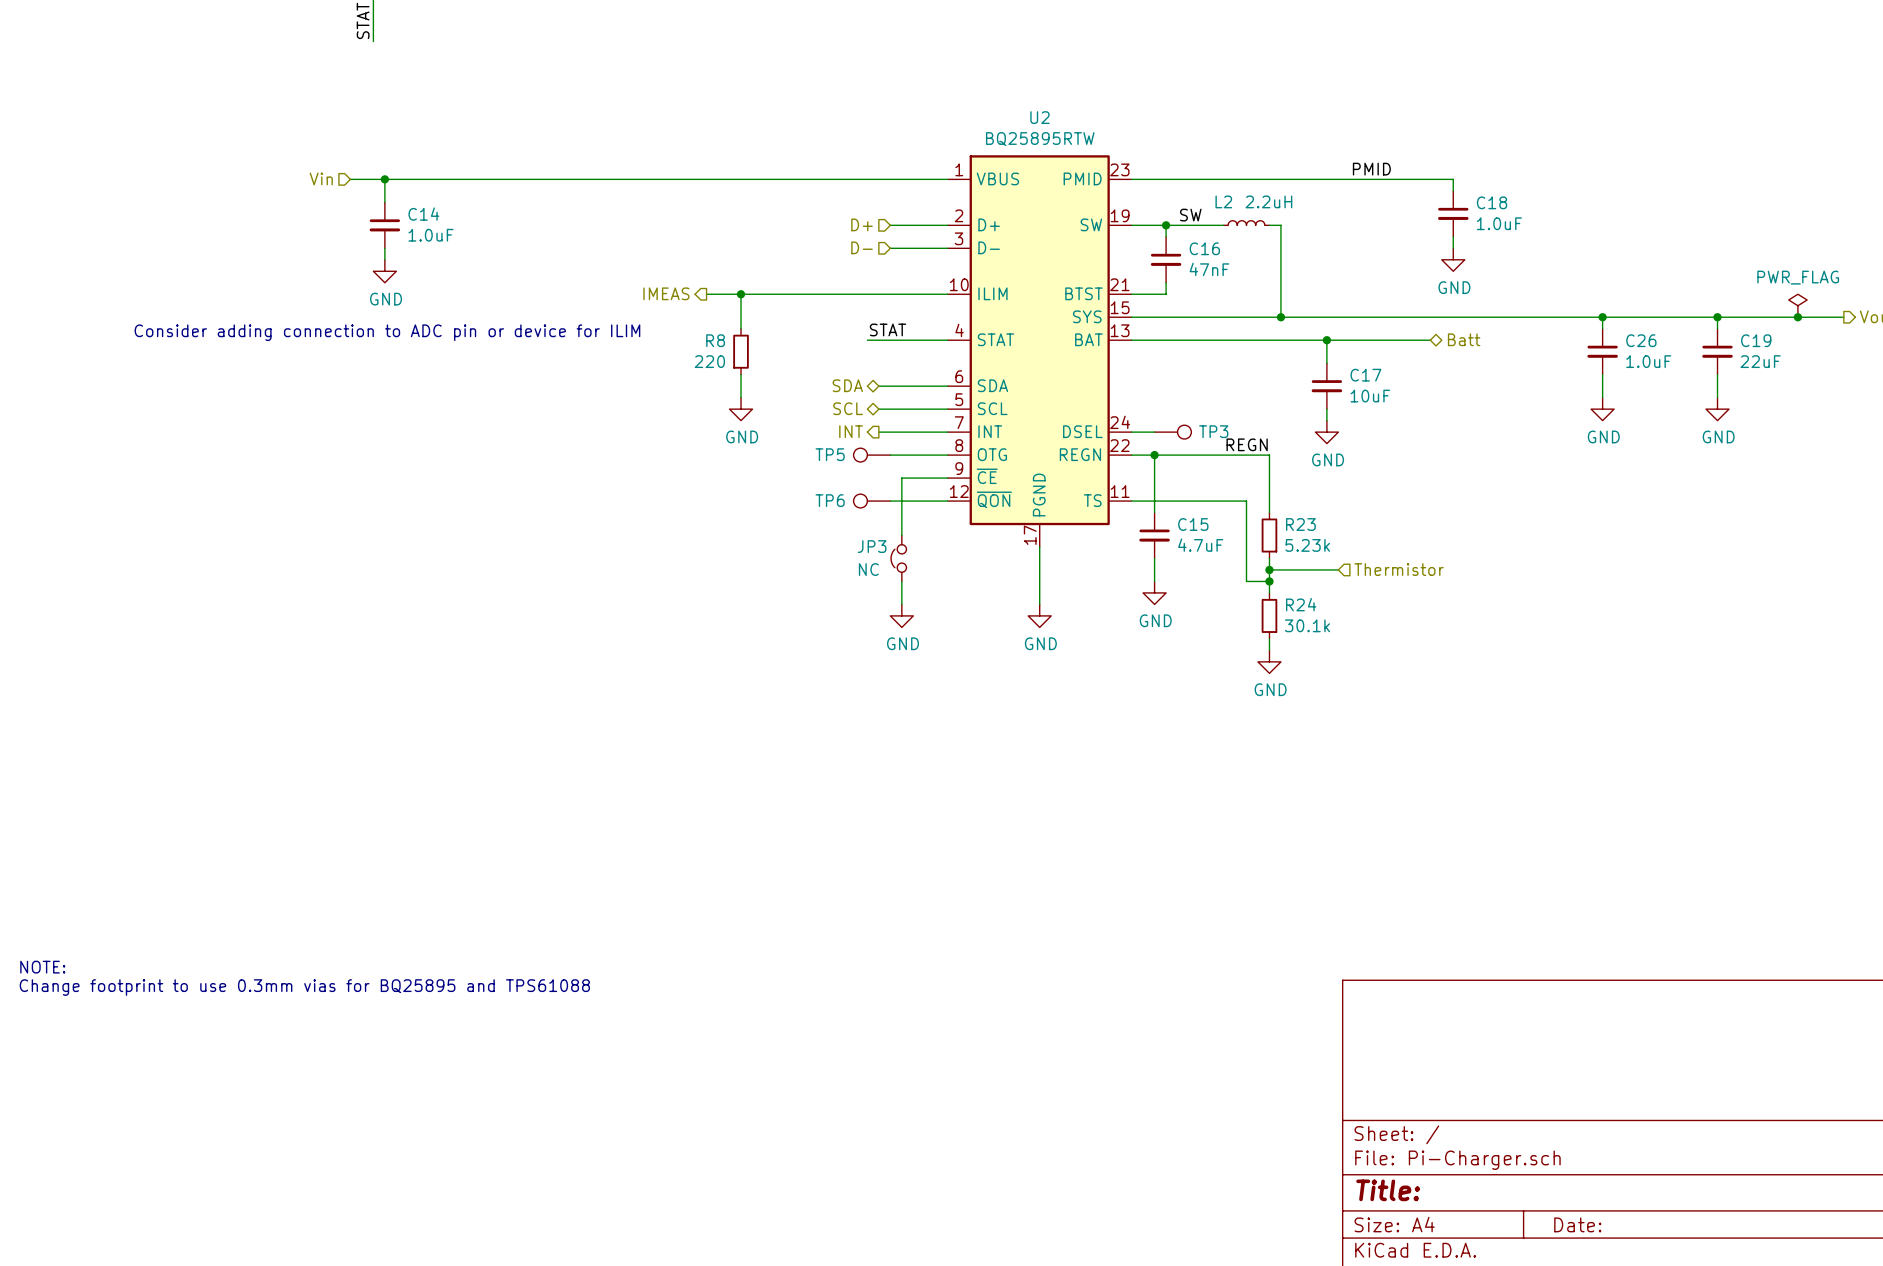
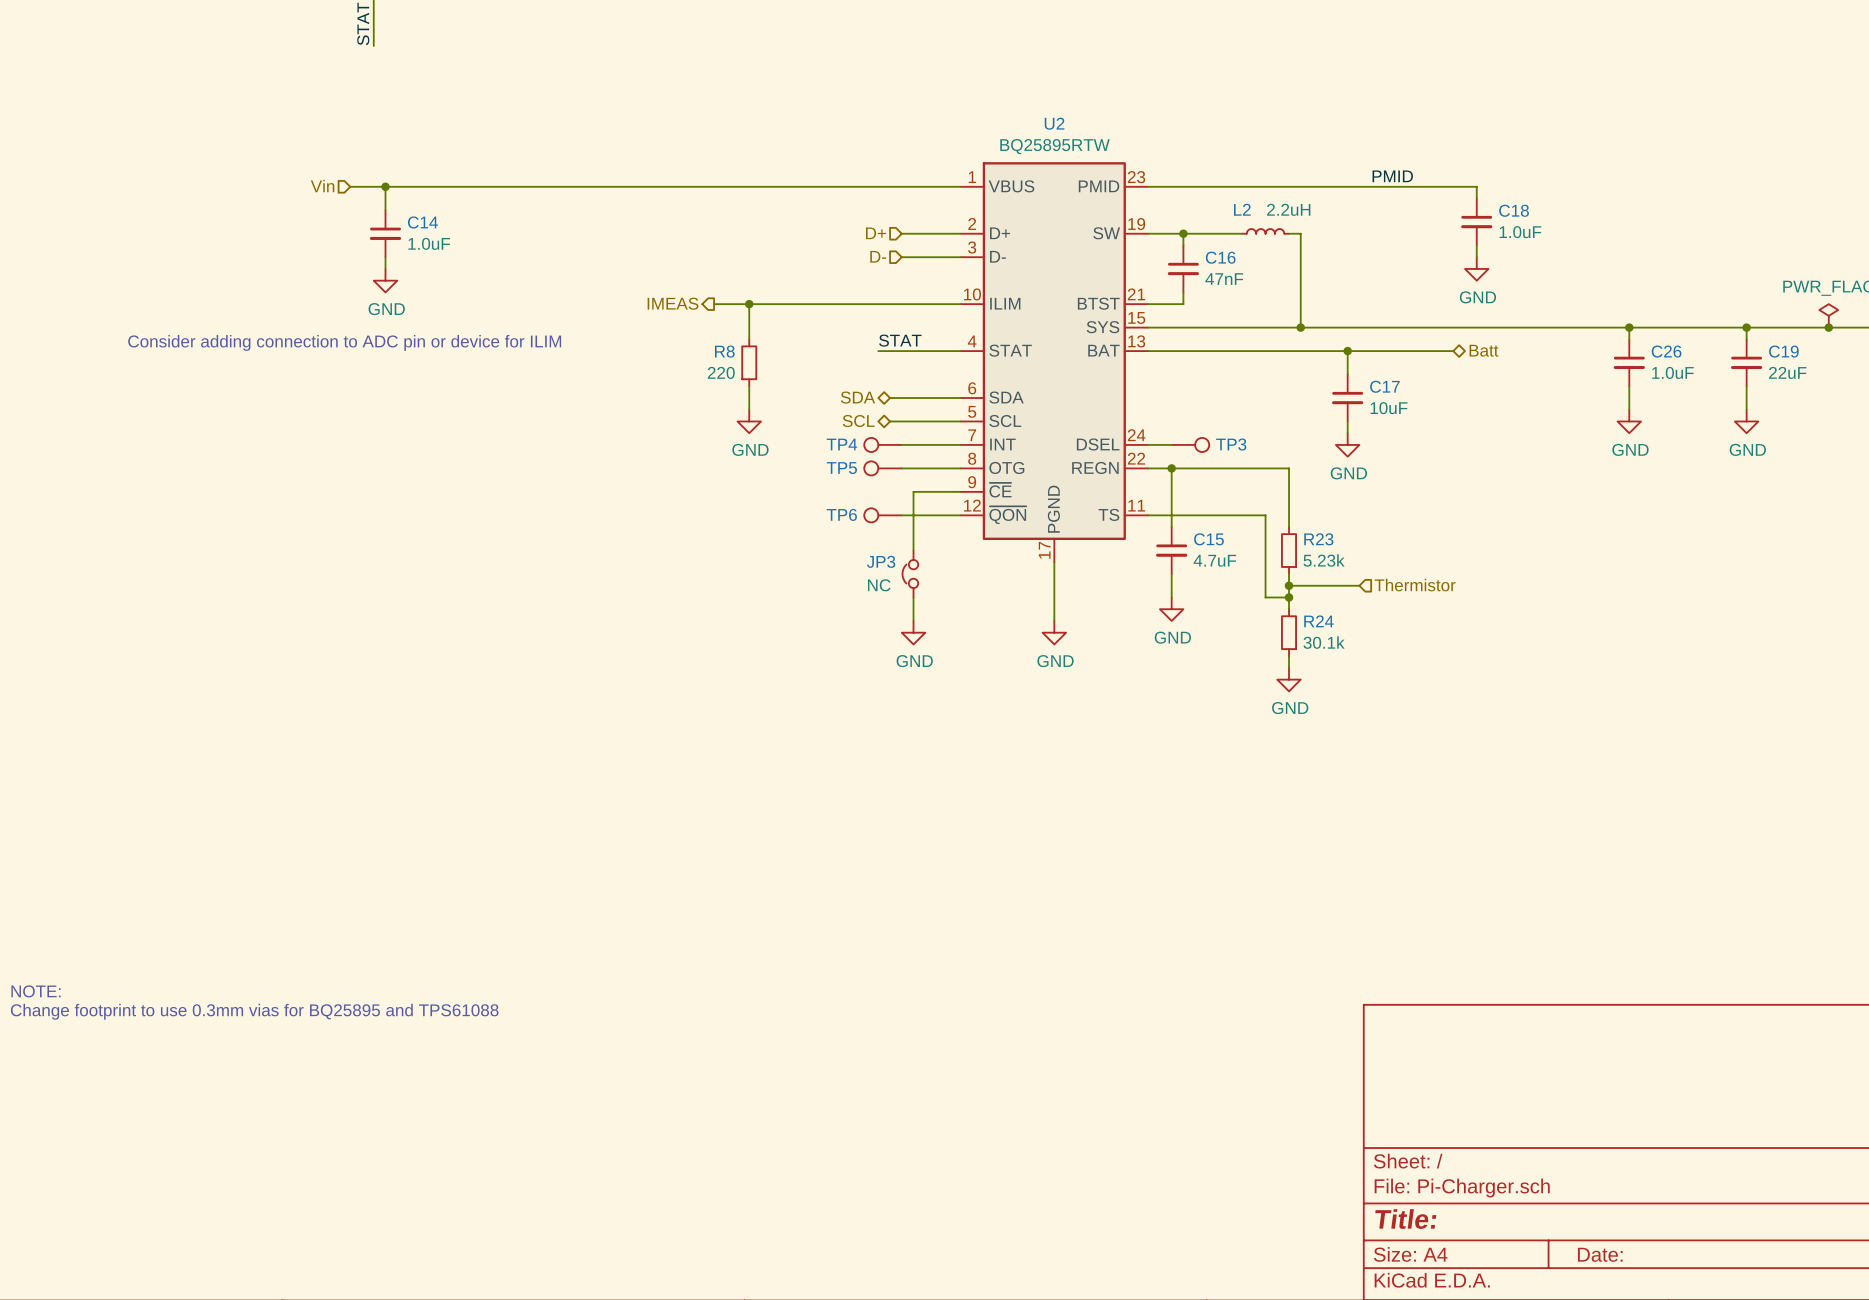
label: SW (1190, 215) -> none
hierarchical label: INT (851, 431) -> none
TP4: none -> (883, 444)
label: REGN (1247, 444) -> none

